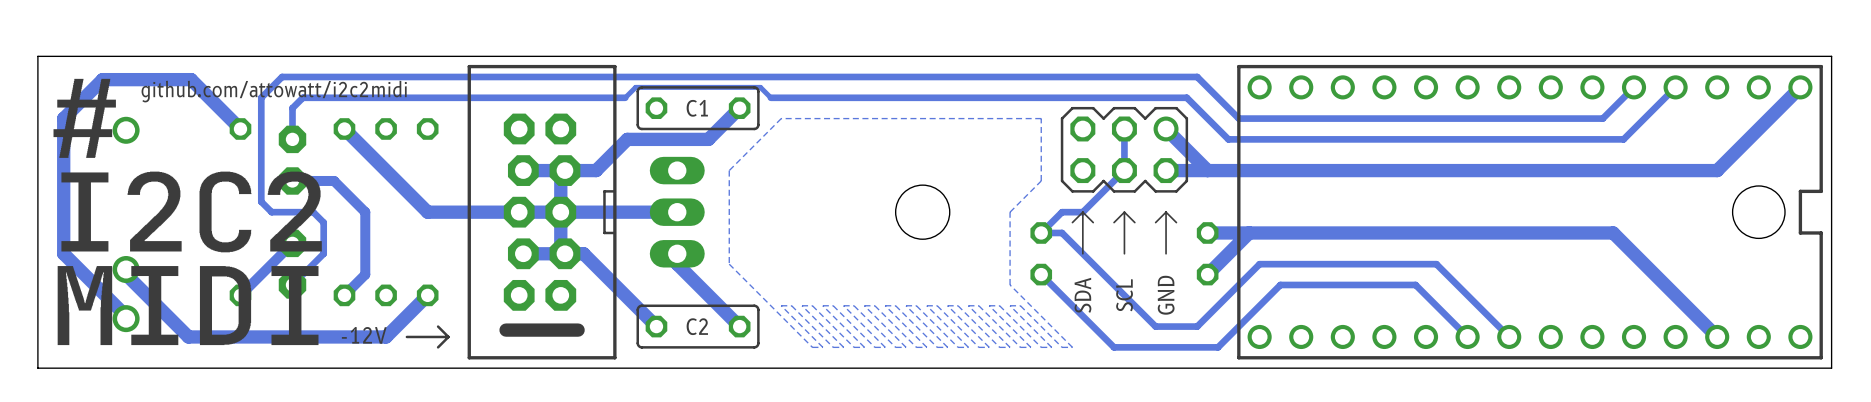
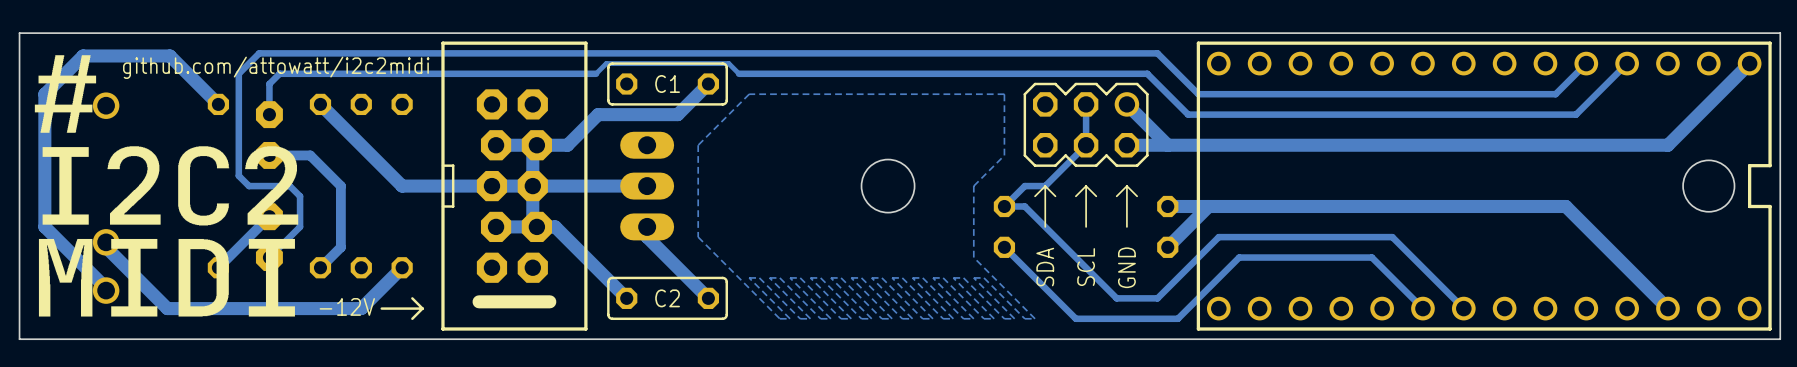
line: none -> (442, 165) (453, 165) (453, 206) (442, 206)
line: (614, 191) (604, 191) (604, 232) (614, 232) -> none

